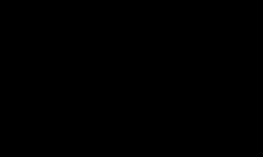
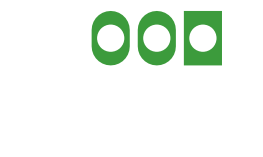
part: none -> (156, 38)

